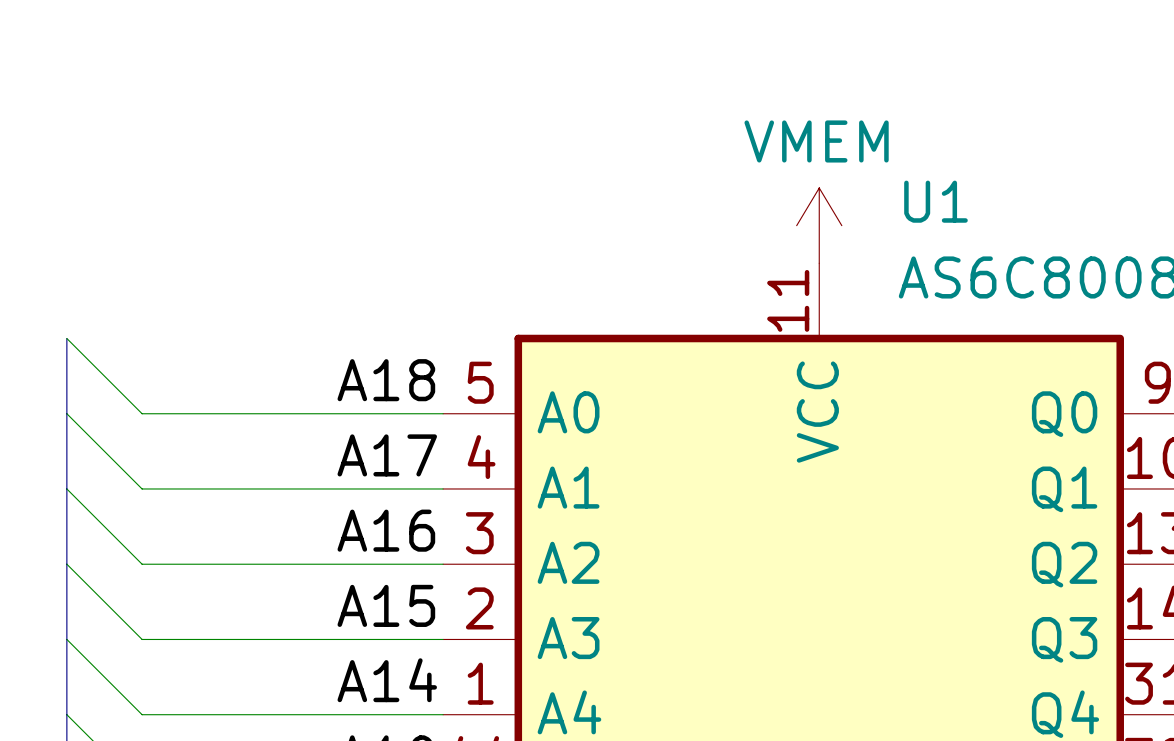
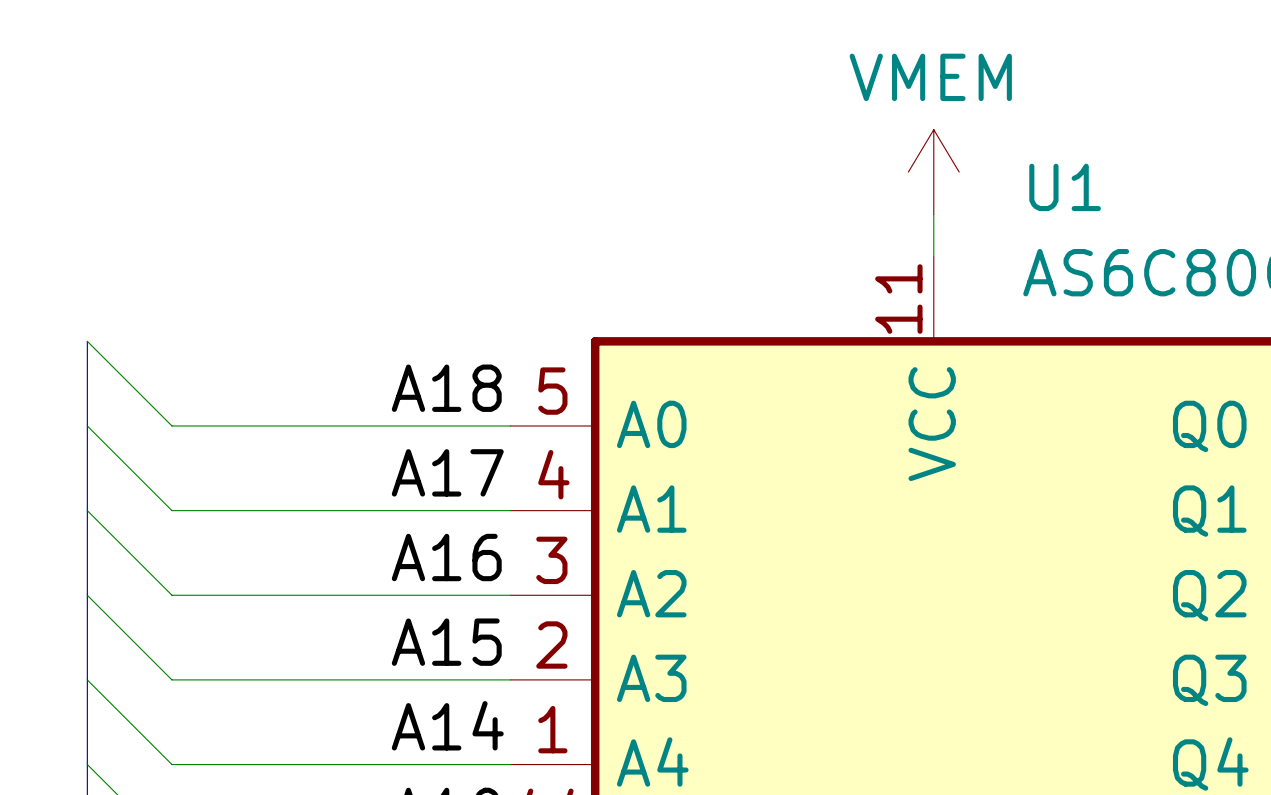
power symbol position: VMEM (819, 225) -> VMEM (933, 172)

